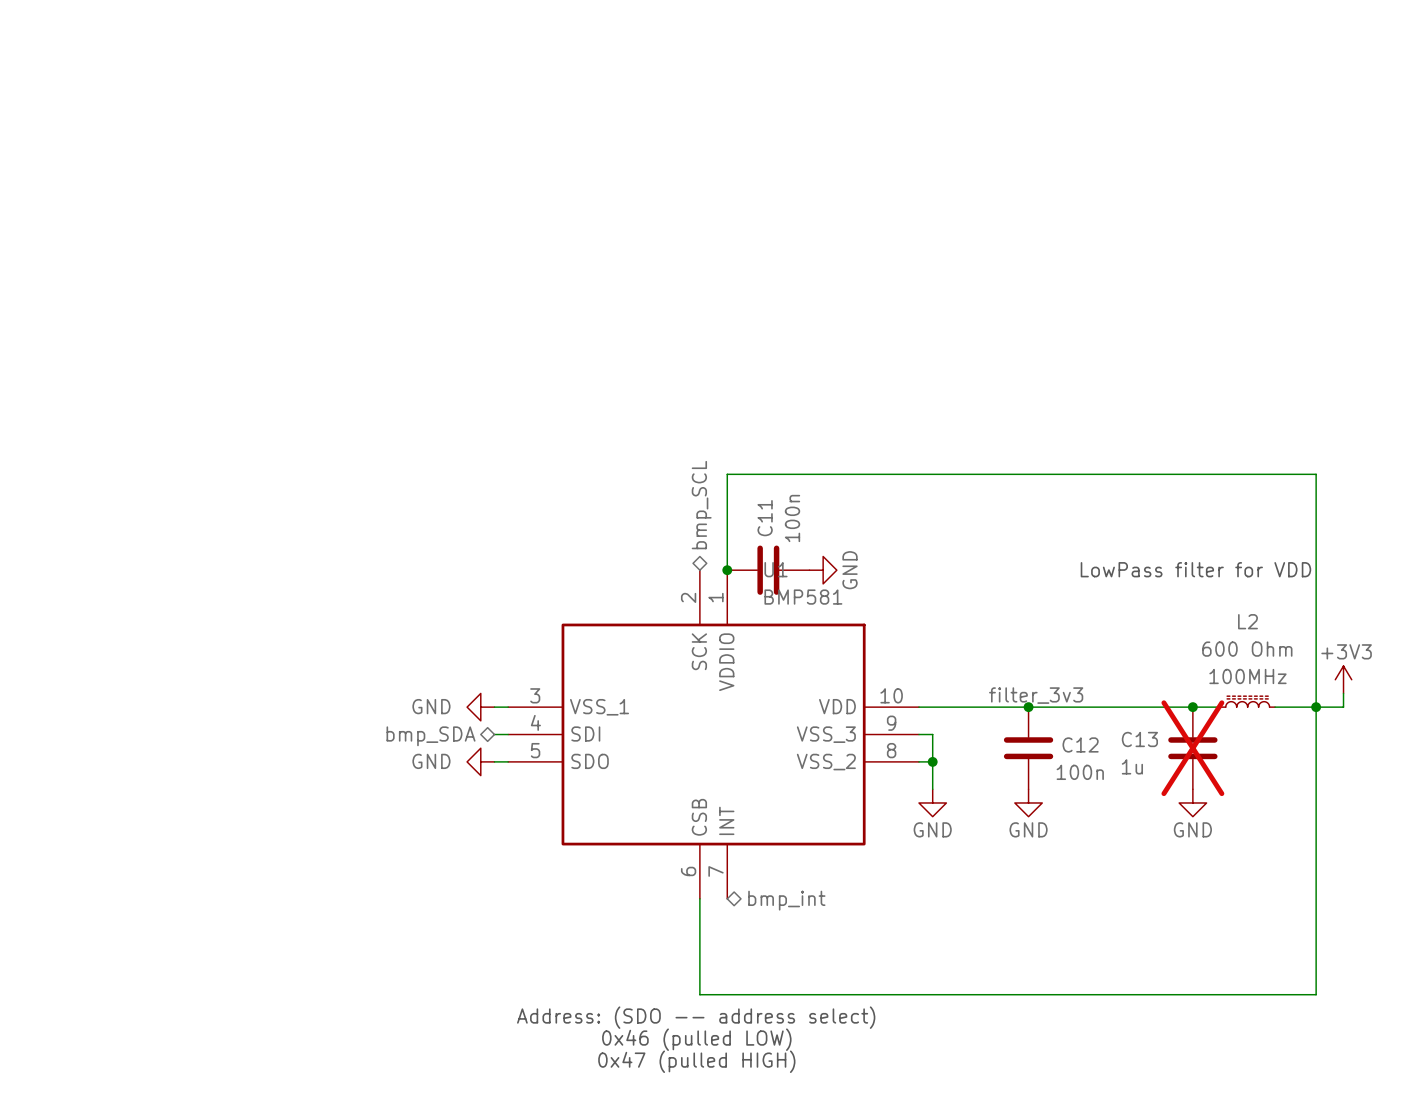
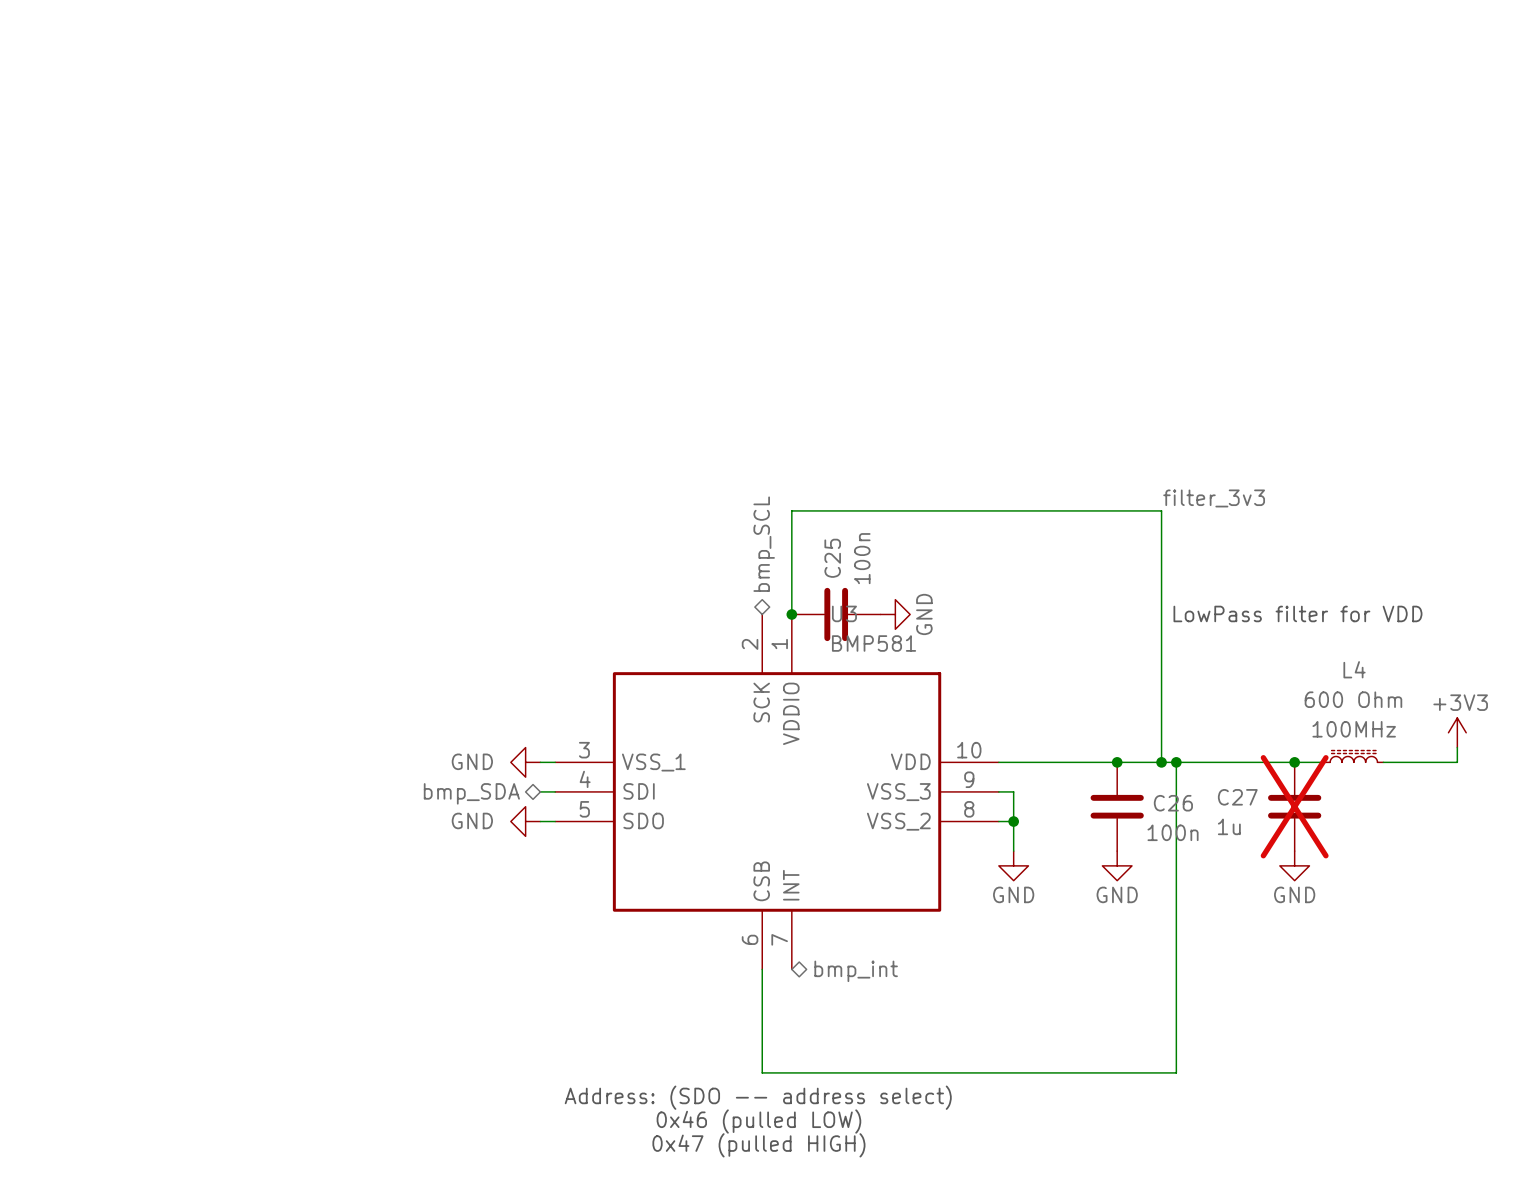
wire: (1069, 474) (1316, 474) (1316, 994) (1083, 994) -> (1176, 762) (1176, 1072)
wire: none -> (1161, 510) (1161, 762)
C11 name: C11 (765, 518) -> C25 (832, 558)
U1 name: U1 (776, 569) -> U3 (844, 613)
L2 name: L2 (1247, 621) -> L4 (1354, 669)
label position: filter_3v3 (1036, 695) -> filter_3v3 (1214, 498)
junction: none -> (1161, 762)
junction: none -> (1176, 762)
junction: (1316, 707) -> none
C13 name: C13 (1139, 739) -> C27 (1237, 797)
C12 name: C12 (1080, 744) -> C26 (1173, 803)

